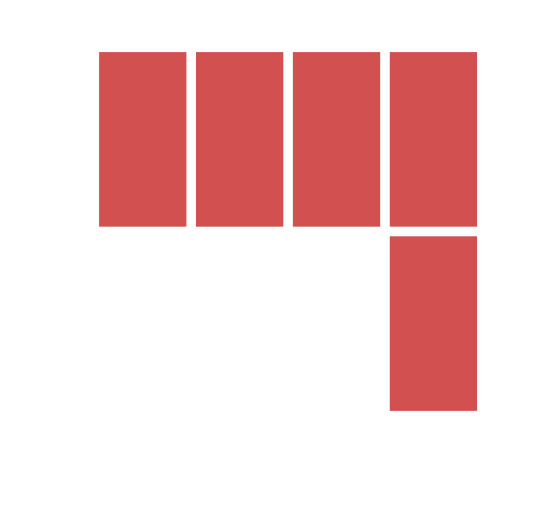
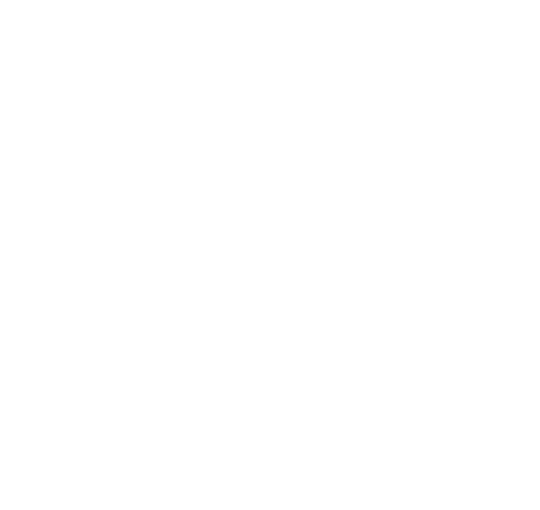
part: (142, 139) -> none
part: (239, 139) -> none
part: (336, 139) -> none
part: (433, 139) -> none
part: (433, 323) -> none

